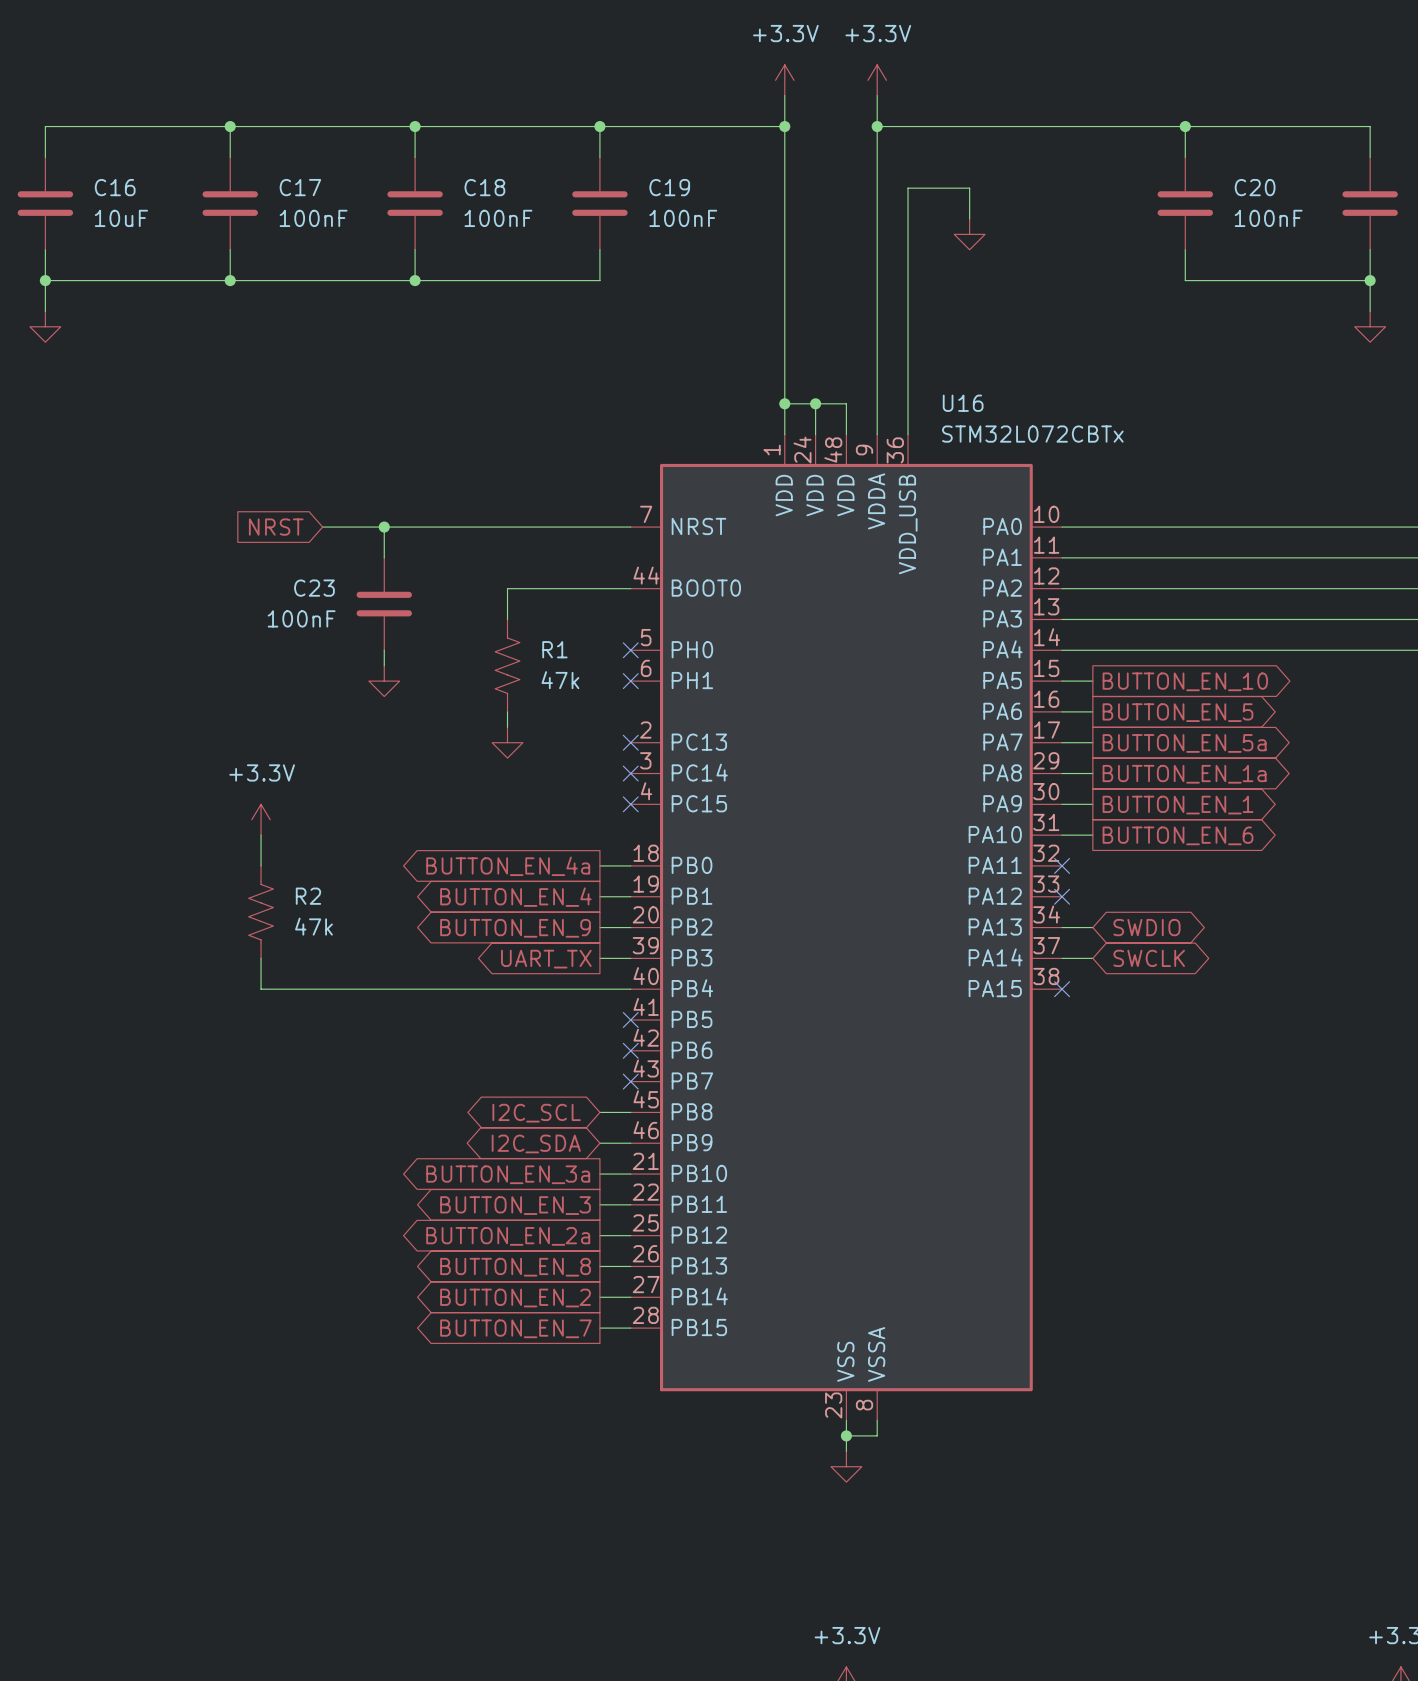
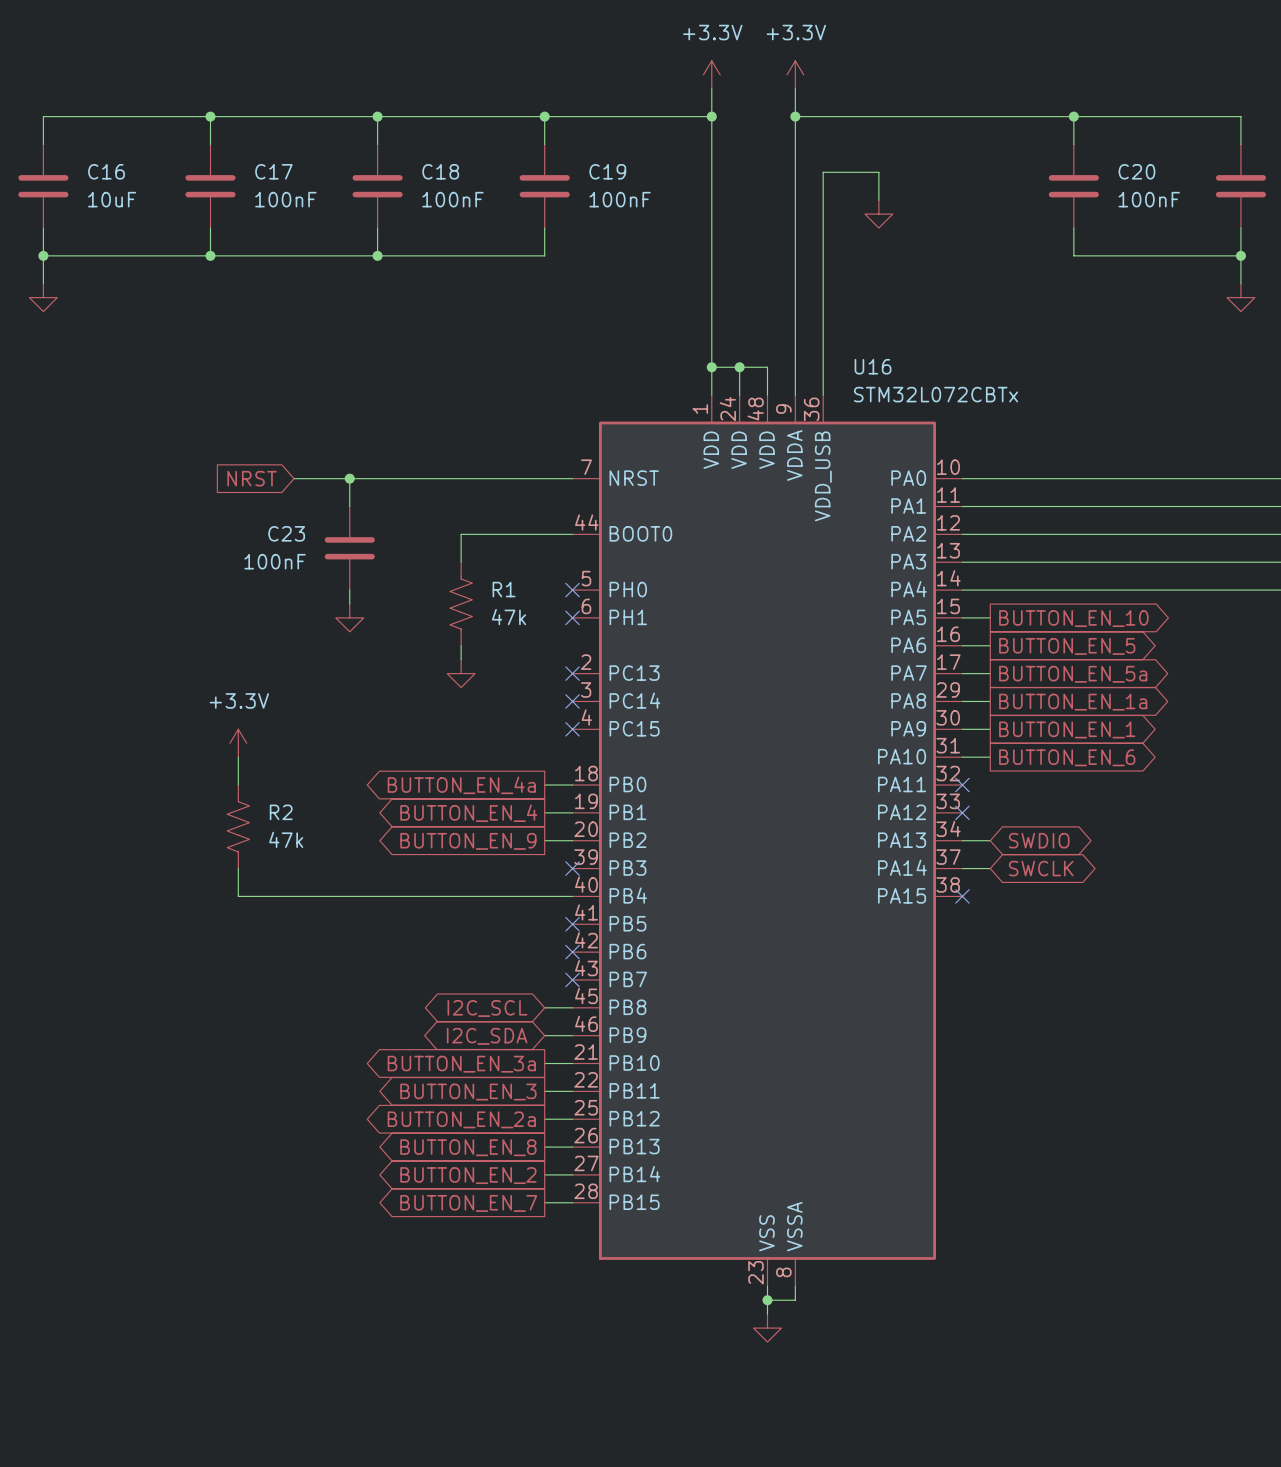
wire: (599, 958) (630, 958) -> none
no-connect mark: none -> (572, 868)
global label: UART_TX (546, 959) -> none

